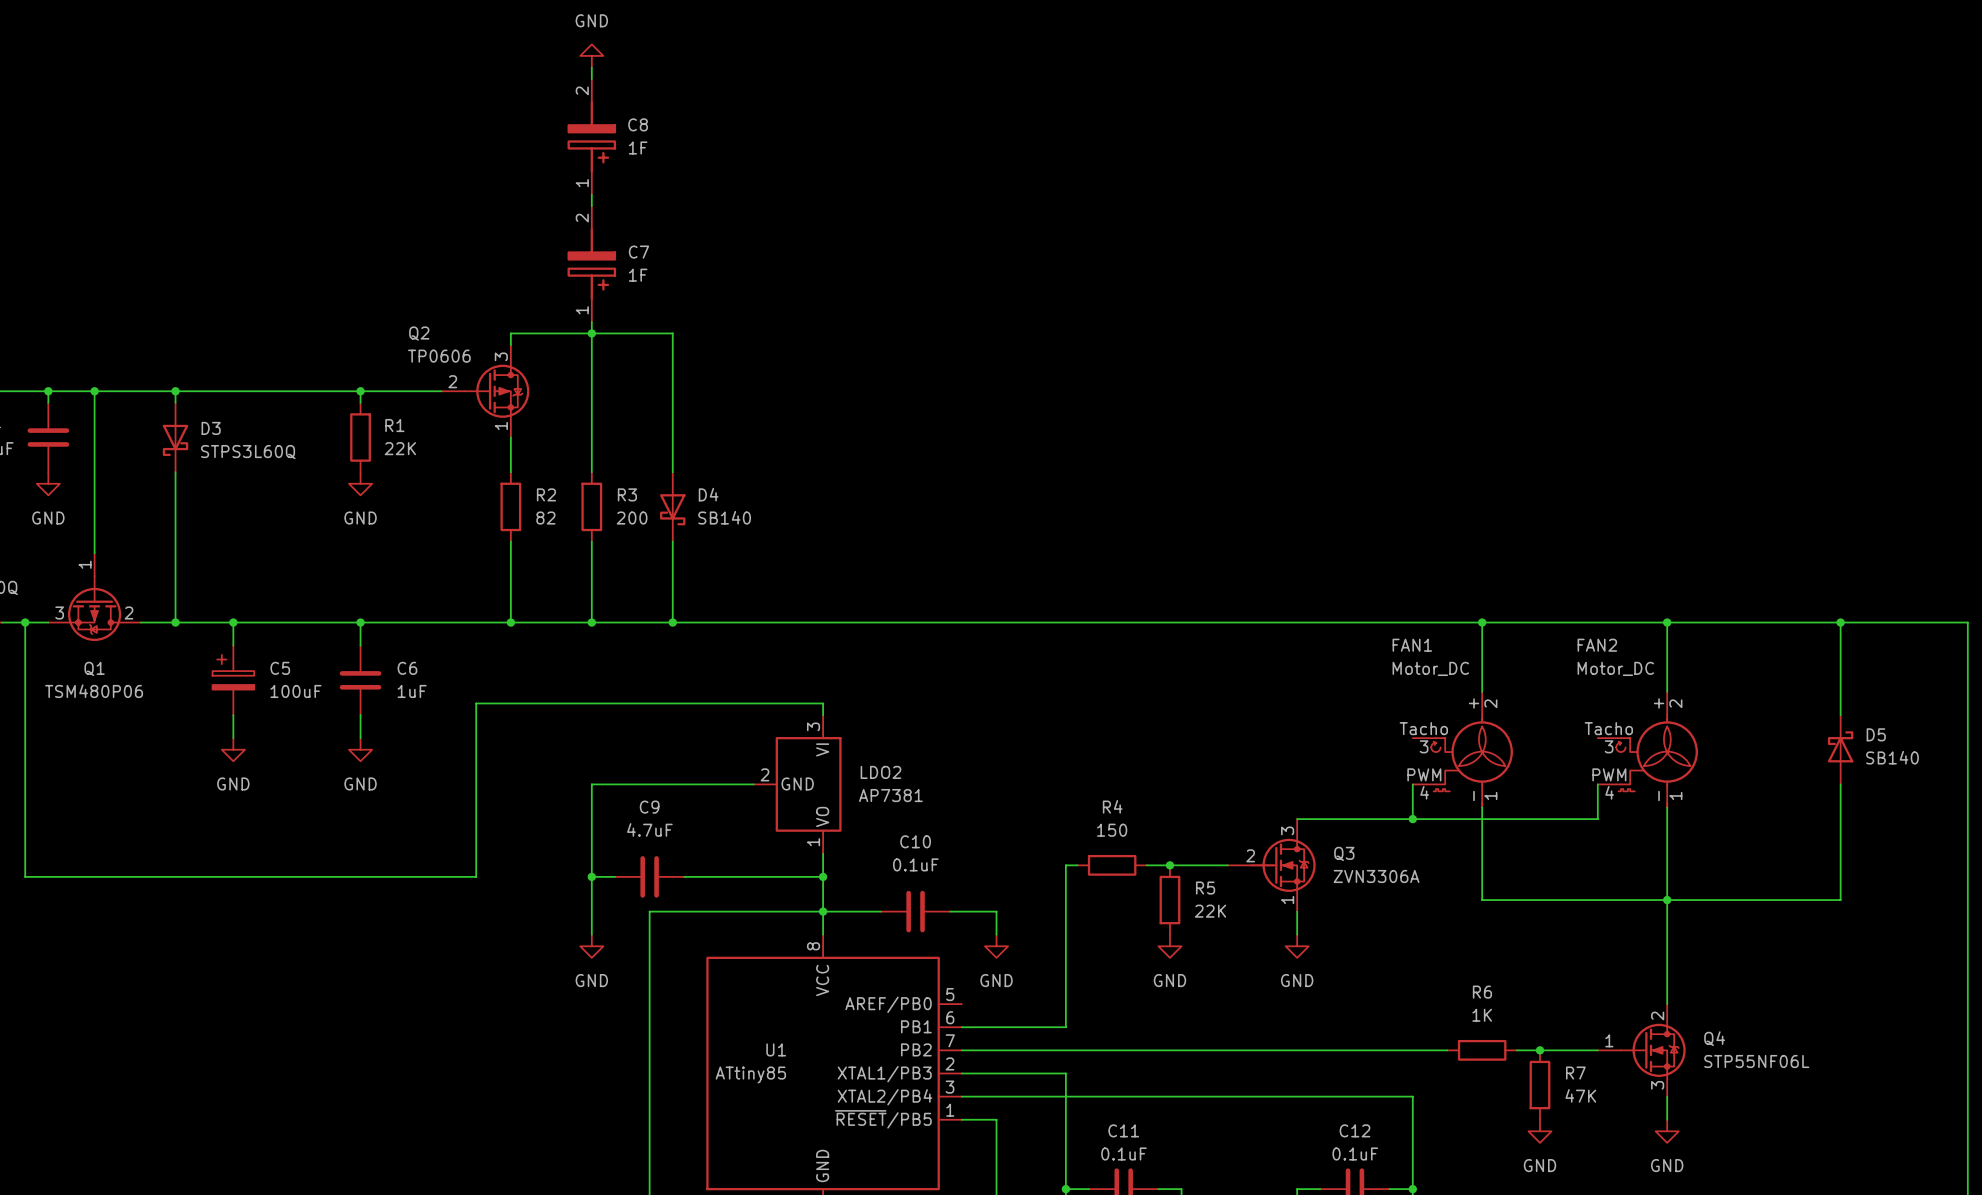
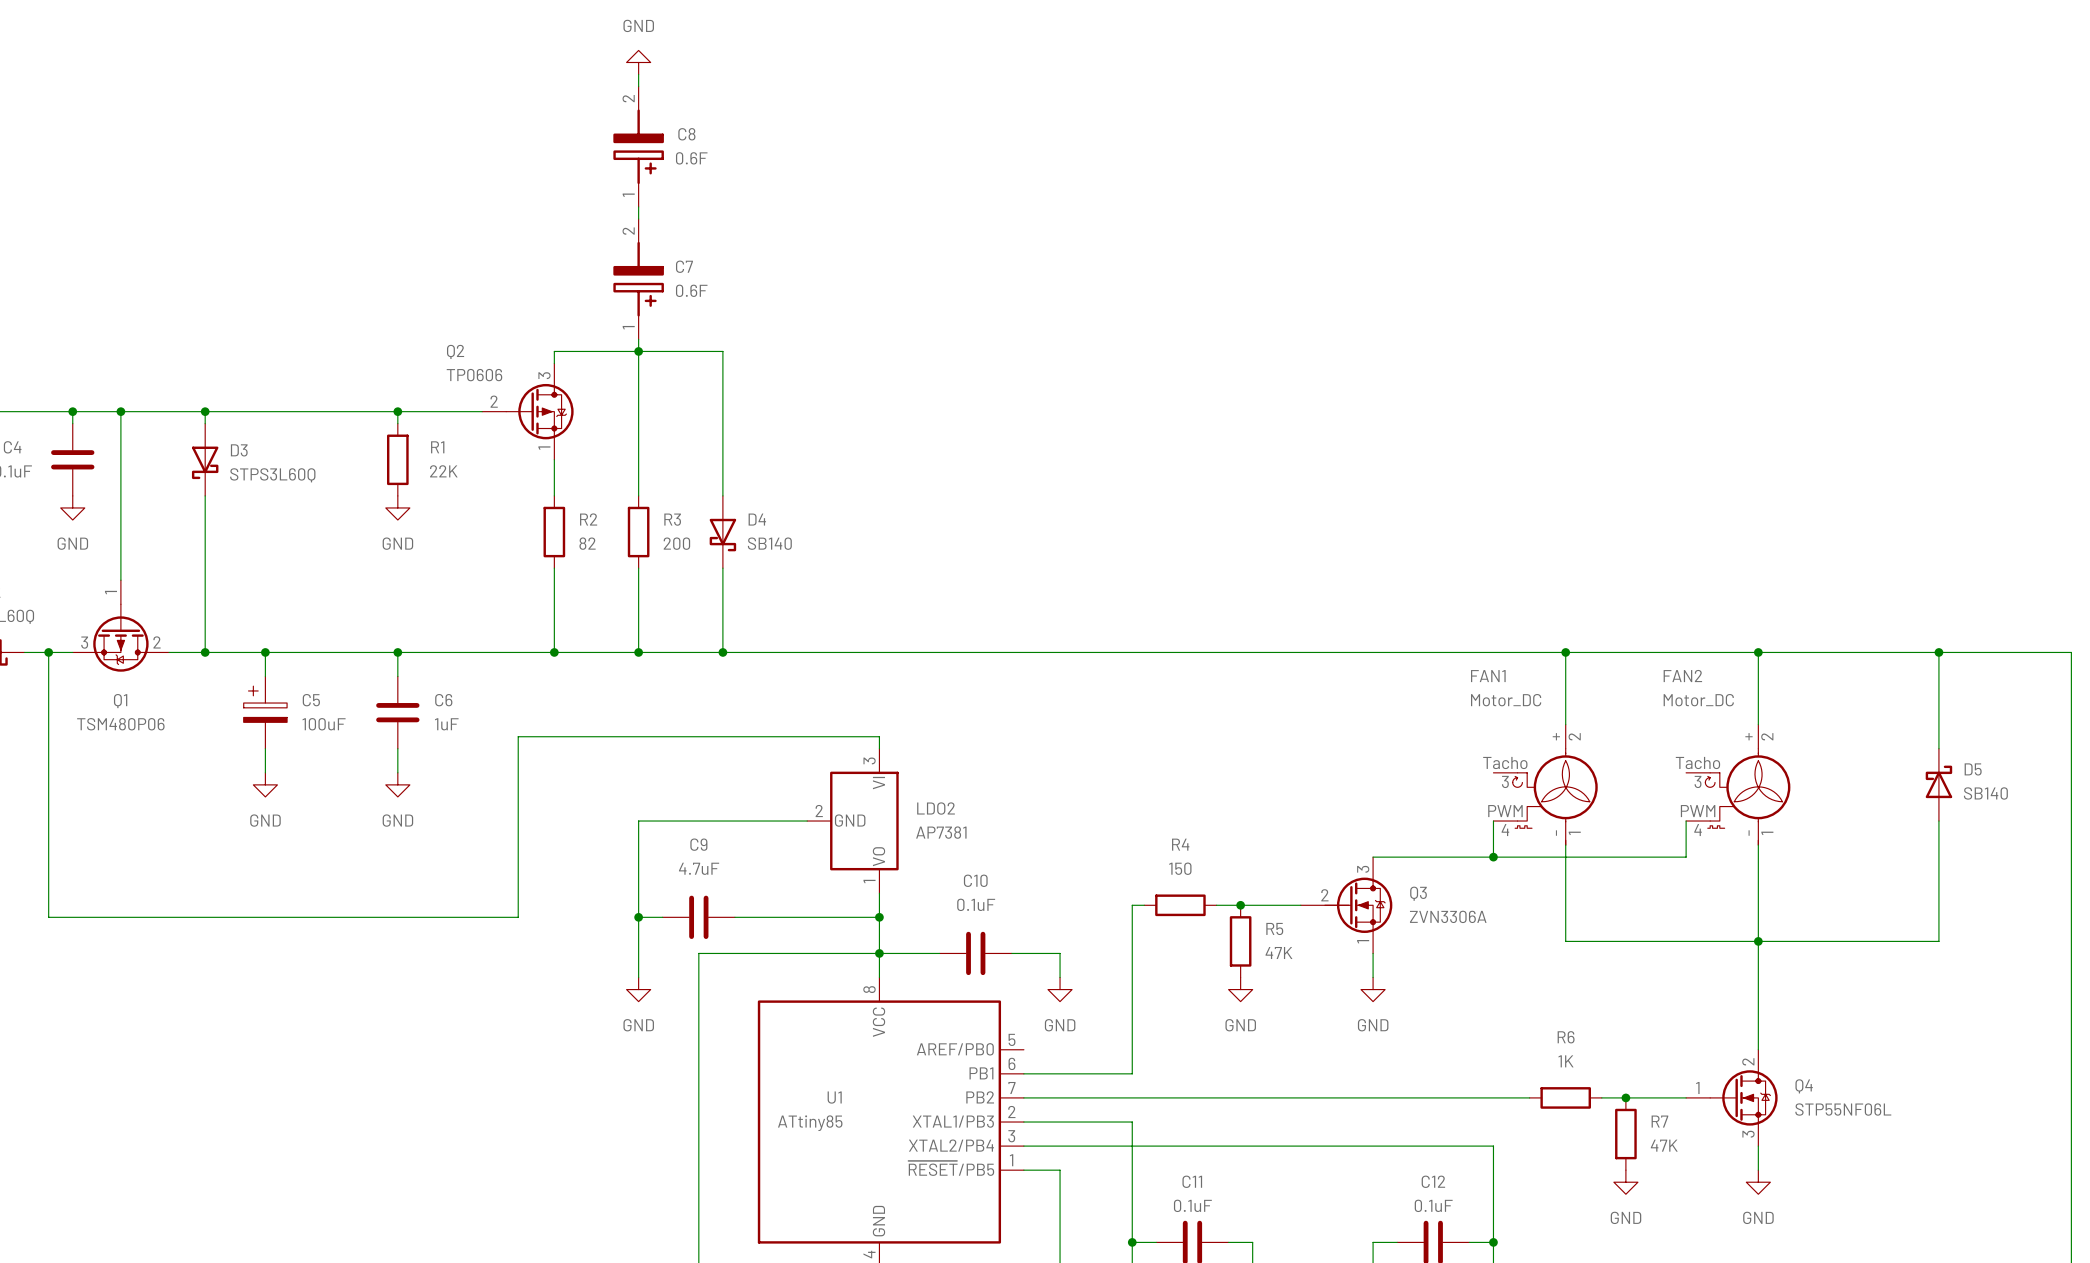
C8 value: 1F (638, 148) -> 0.6F (691, 158)
C7 value: 1F (638, 275) -> 0.6F (691, 290)
R5 value: 22K (1210, 911) -> 47K (1278, 953)

